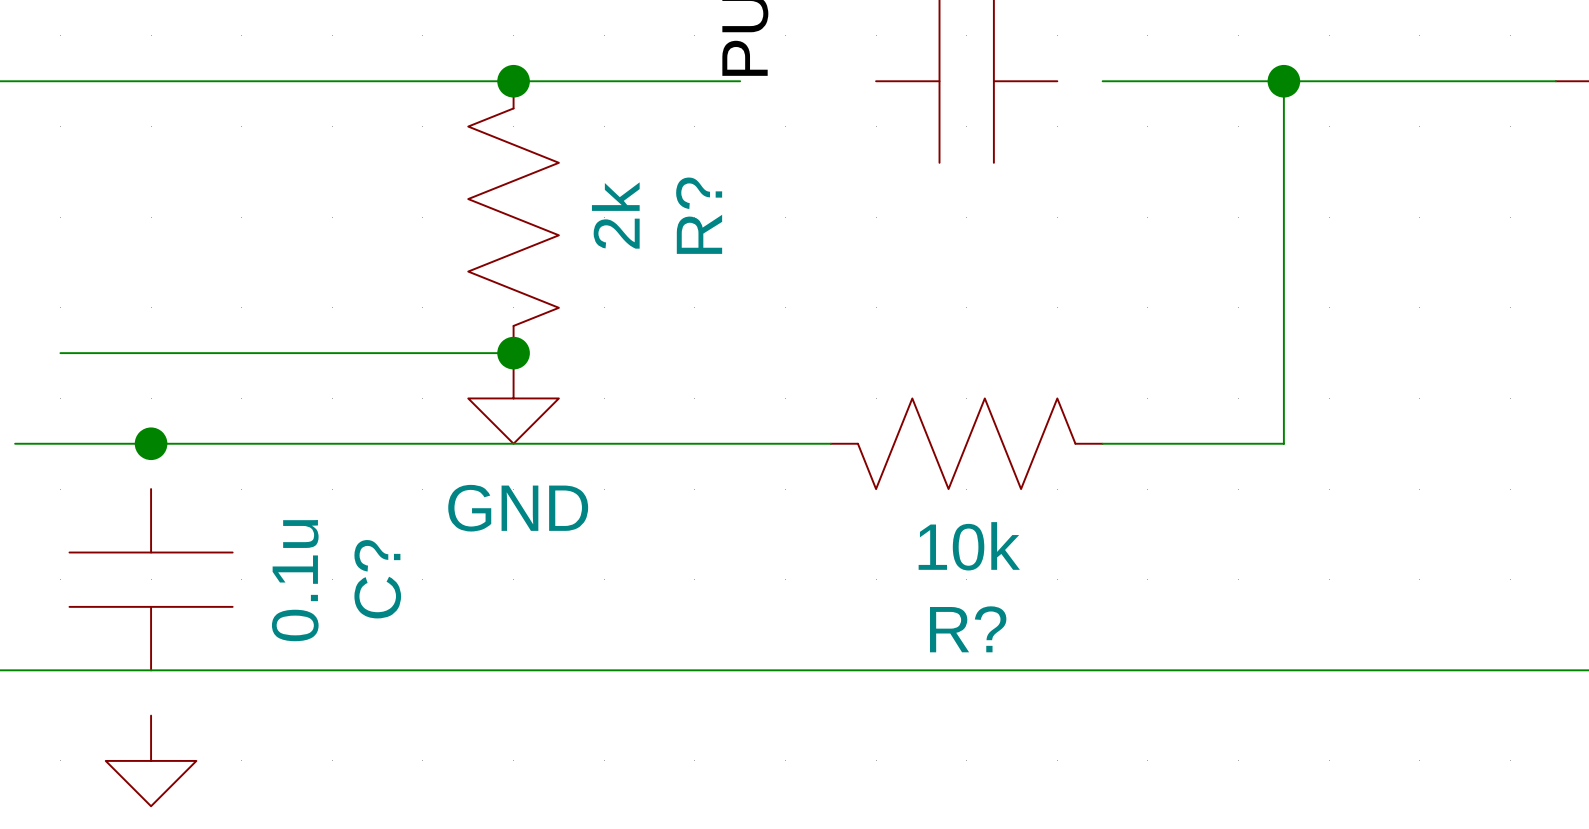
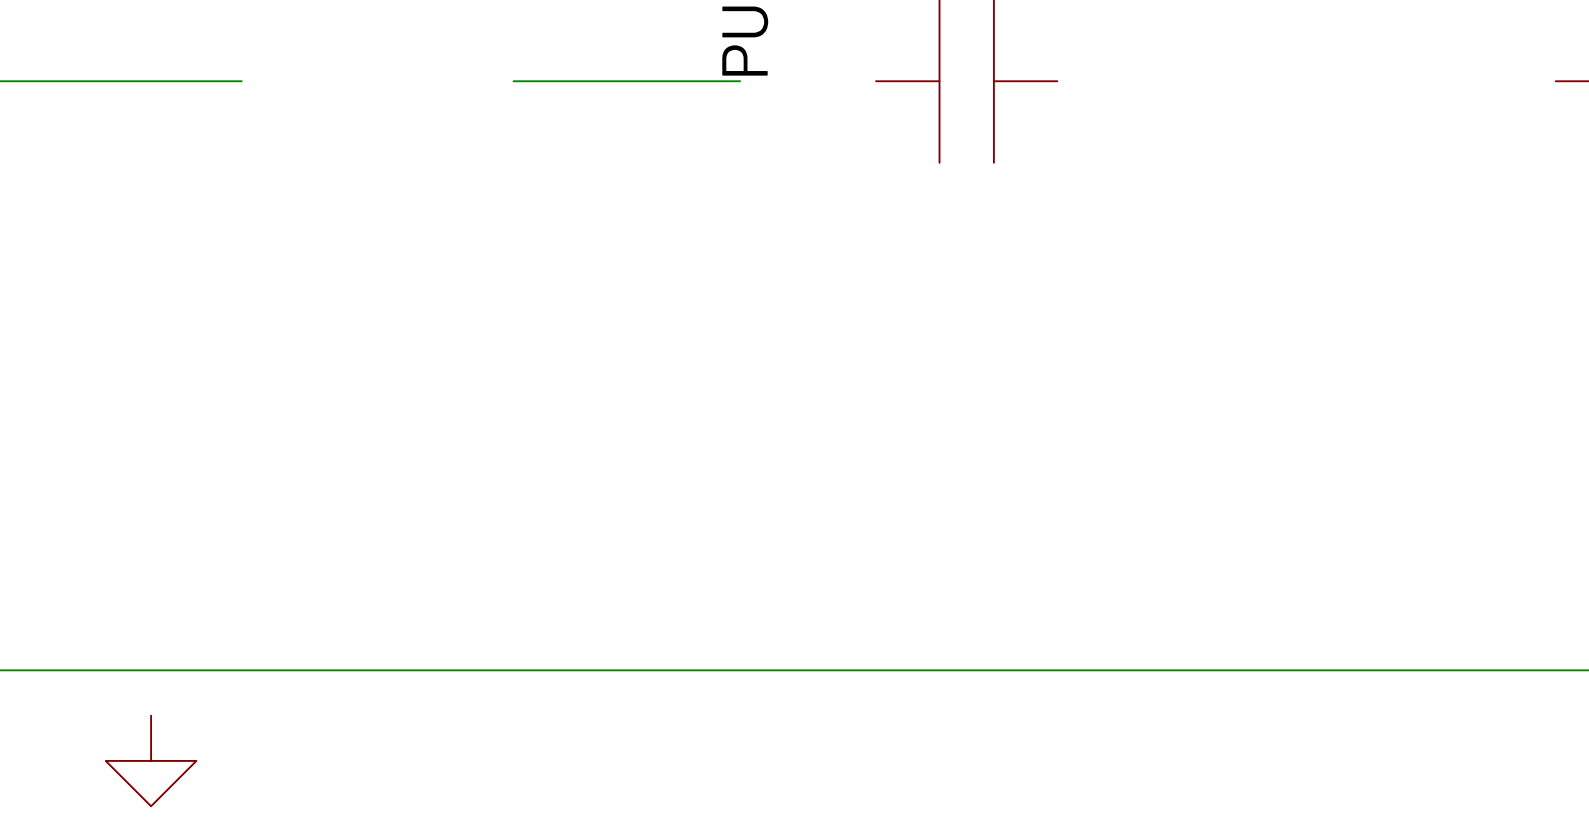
wire: (241, 81) (513, 81) -> none
junction: (513, 81) -> none
wire: (1102, 81) (1555, 81) -> none
wire: (1283, 81) (1283, 443) (1102, 443) -> none
junction: (1283, 81) -> none
R?: 2k (513, 217) -> none
wire: (60, 353) (513, 353) -> none
junction: (513, 353) -> none
power symbol: GND (513, 398) -> none
wire: (15, 443) (830, 443) -> none
junction: (151, 443) -> none
R?: 10k (966, 443) -> none
C?: 0.1u (151, 579) -> none

